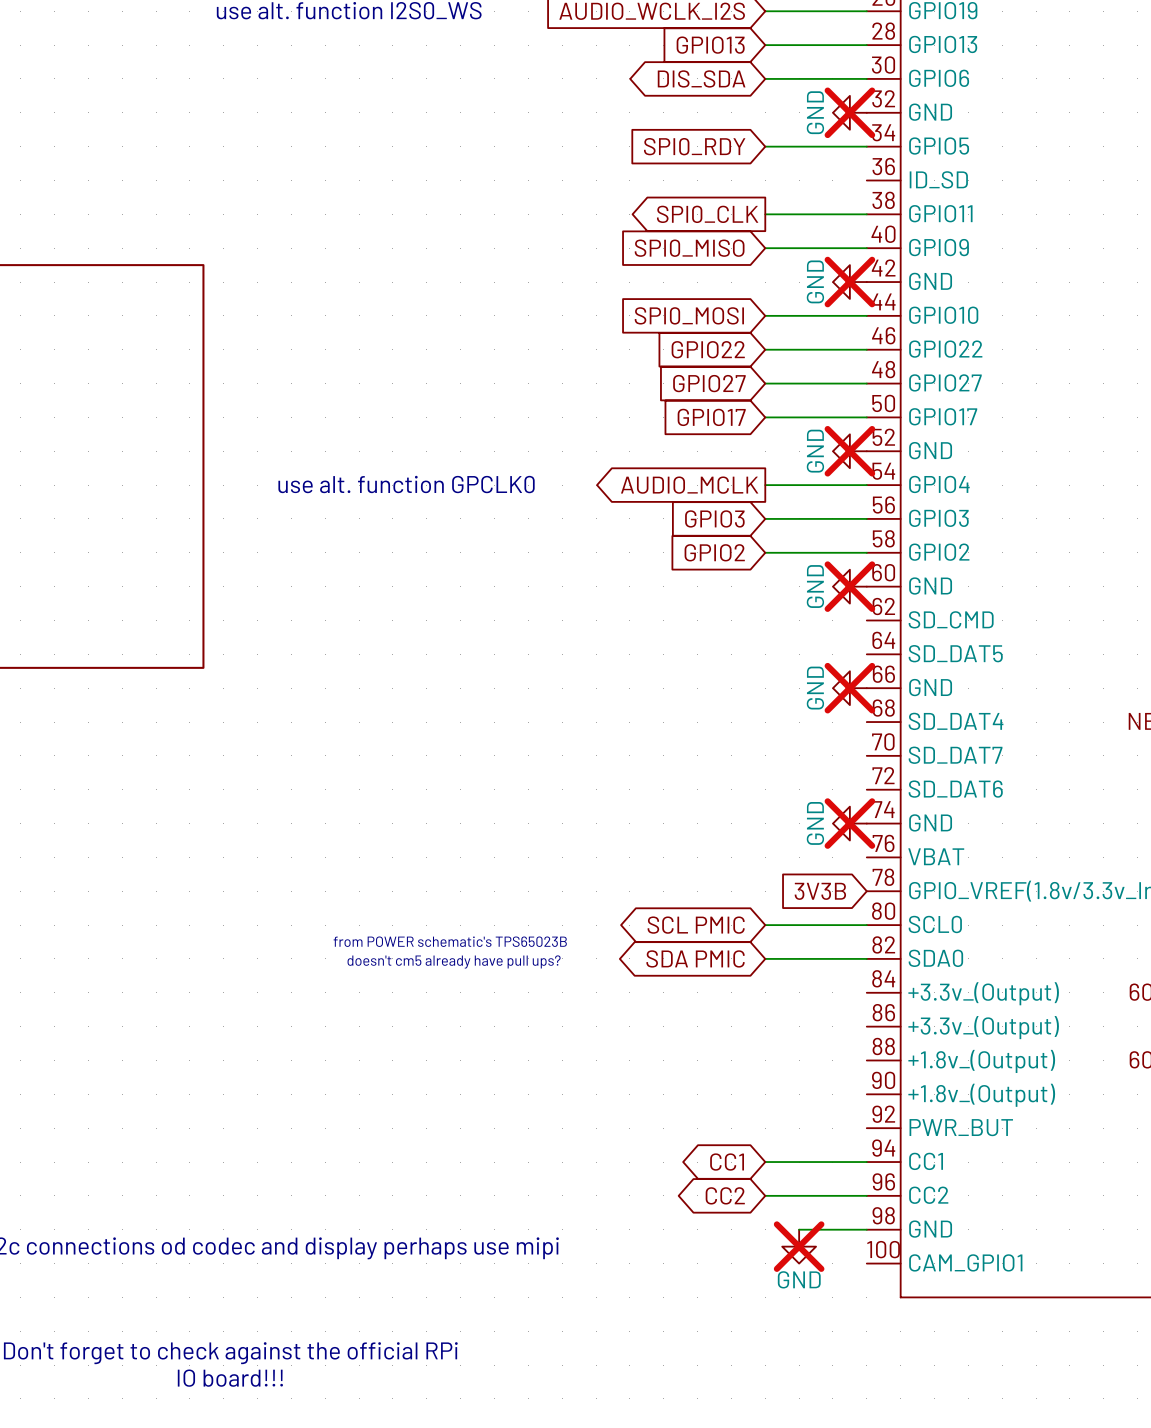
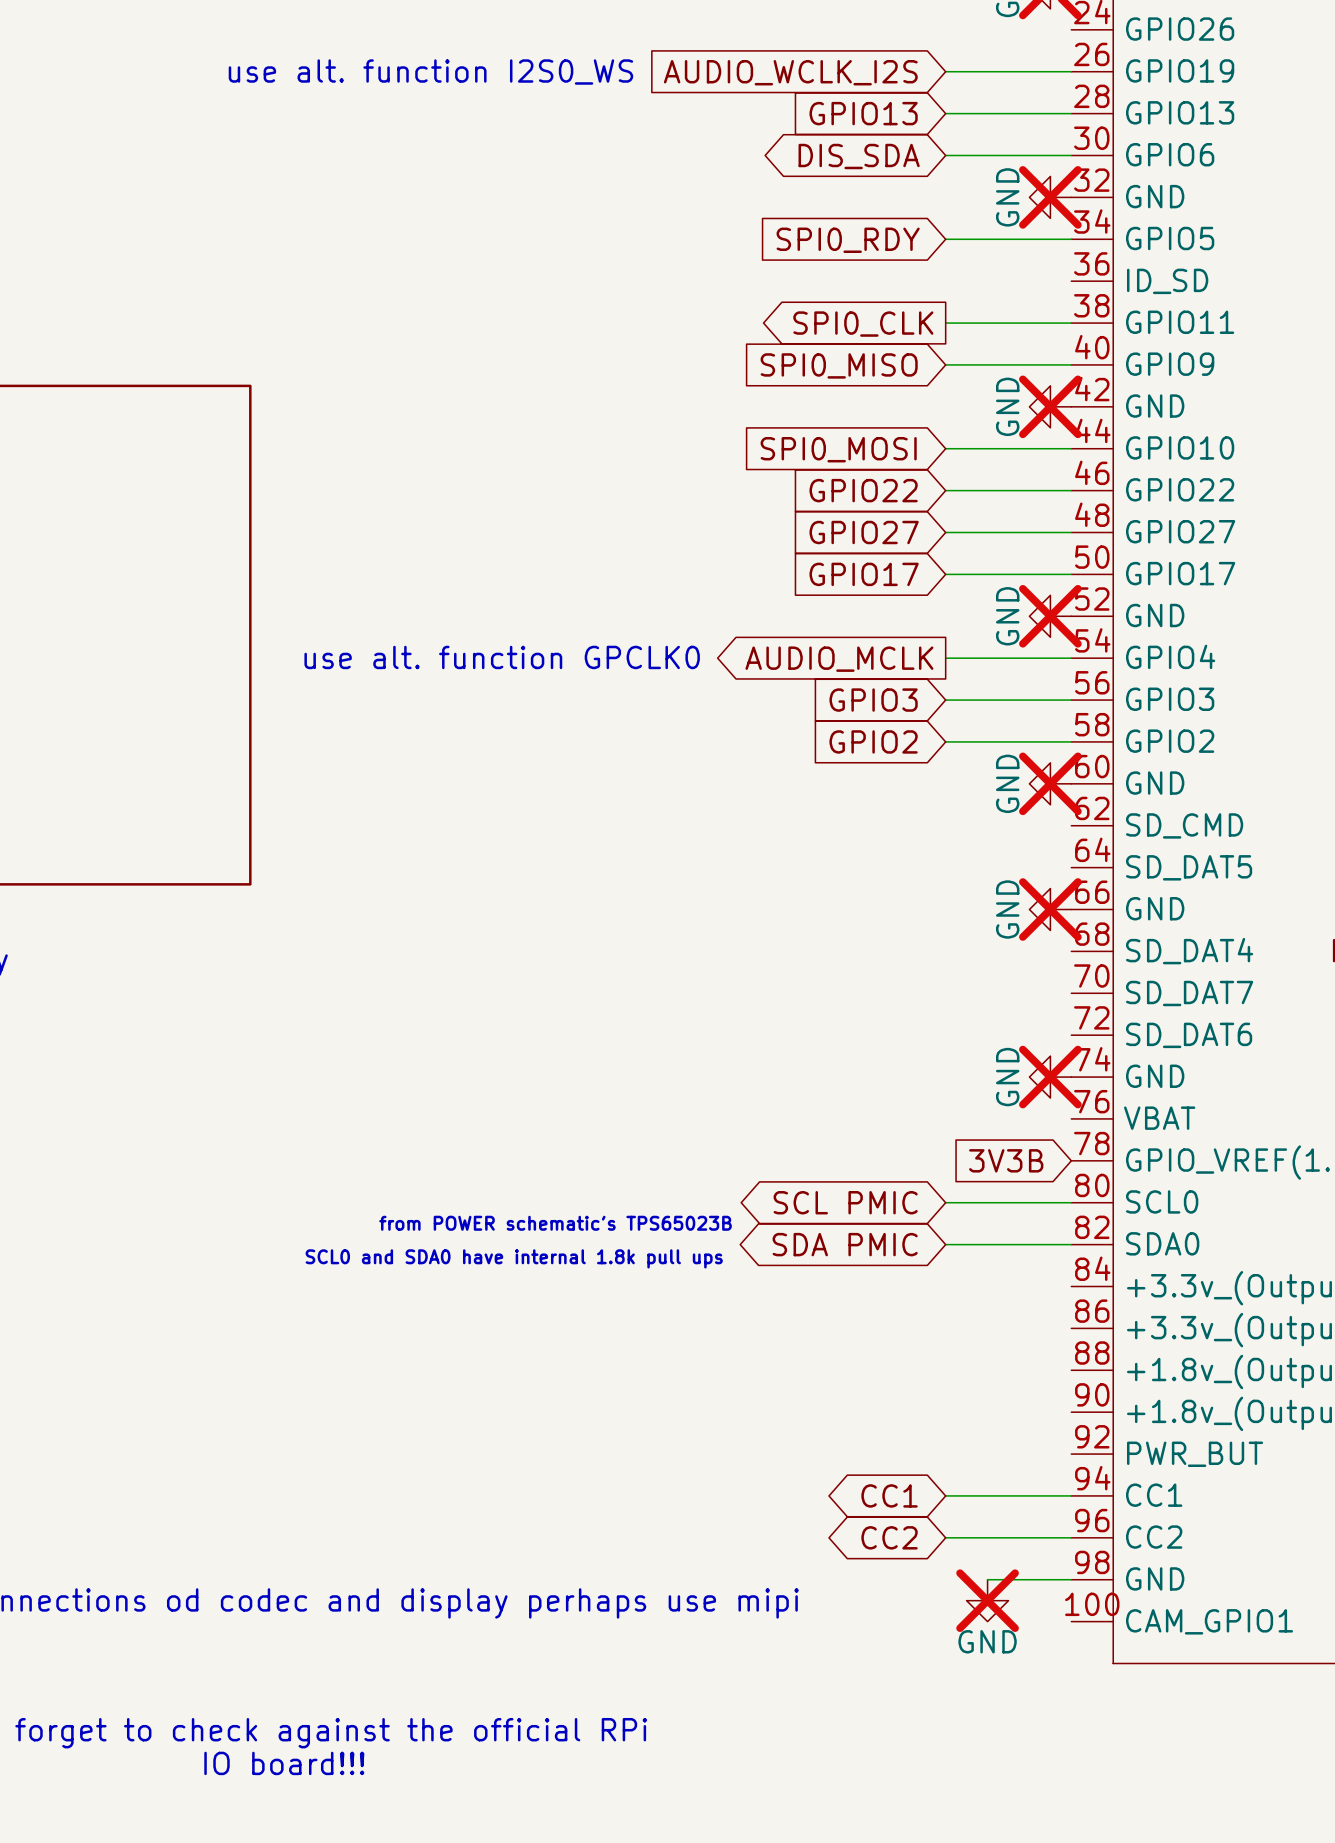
text: doesn't cm5 already have pull ups? (454, 961) -> none
text: none -> SCL0 and SDA0 have internal 1.8k pull ups (514, 1258)

